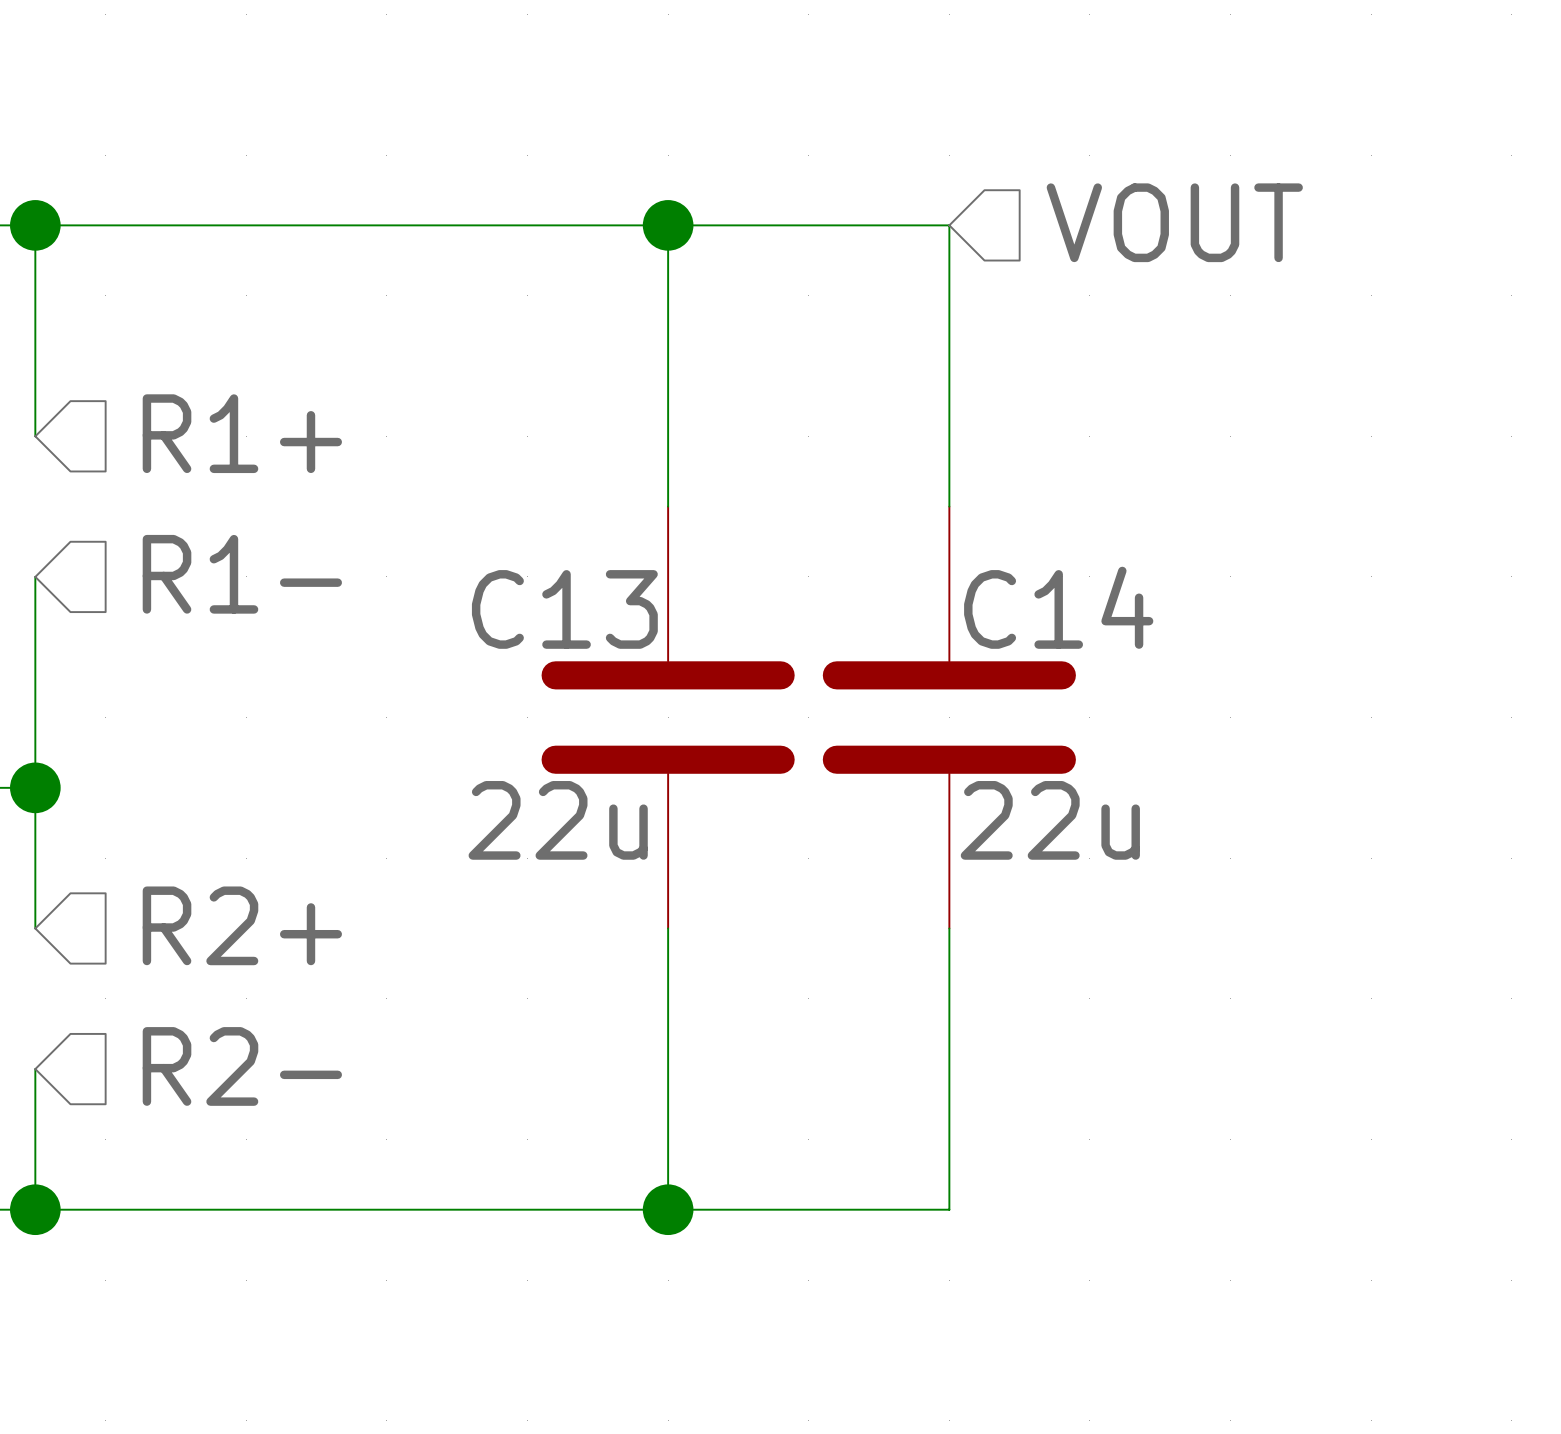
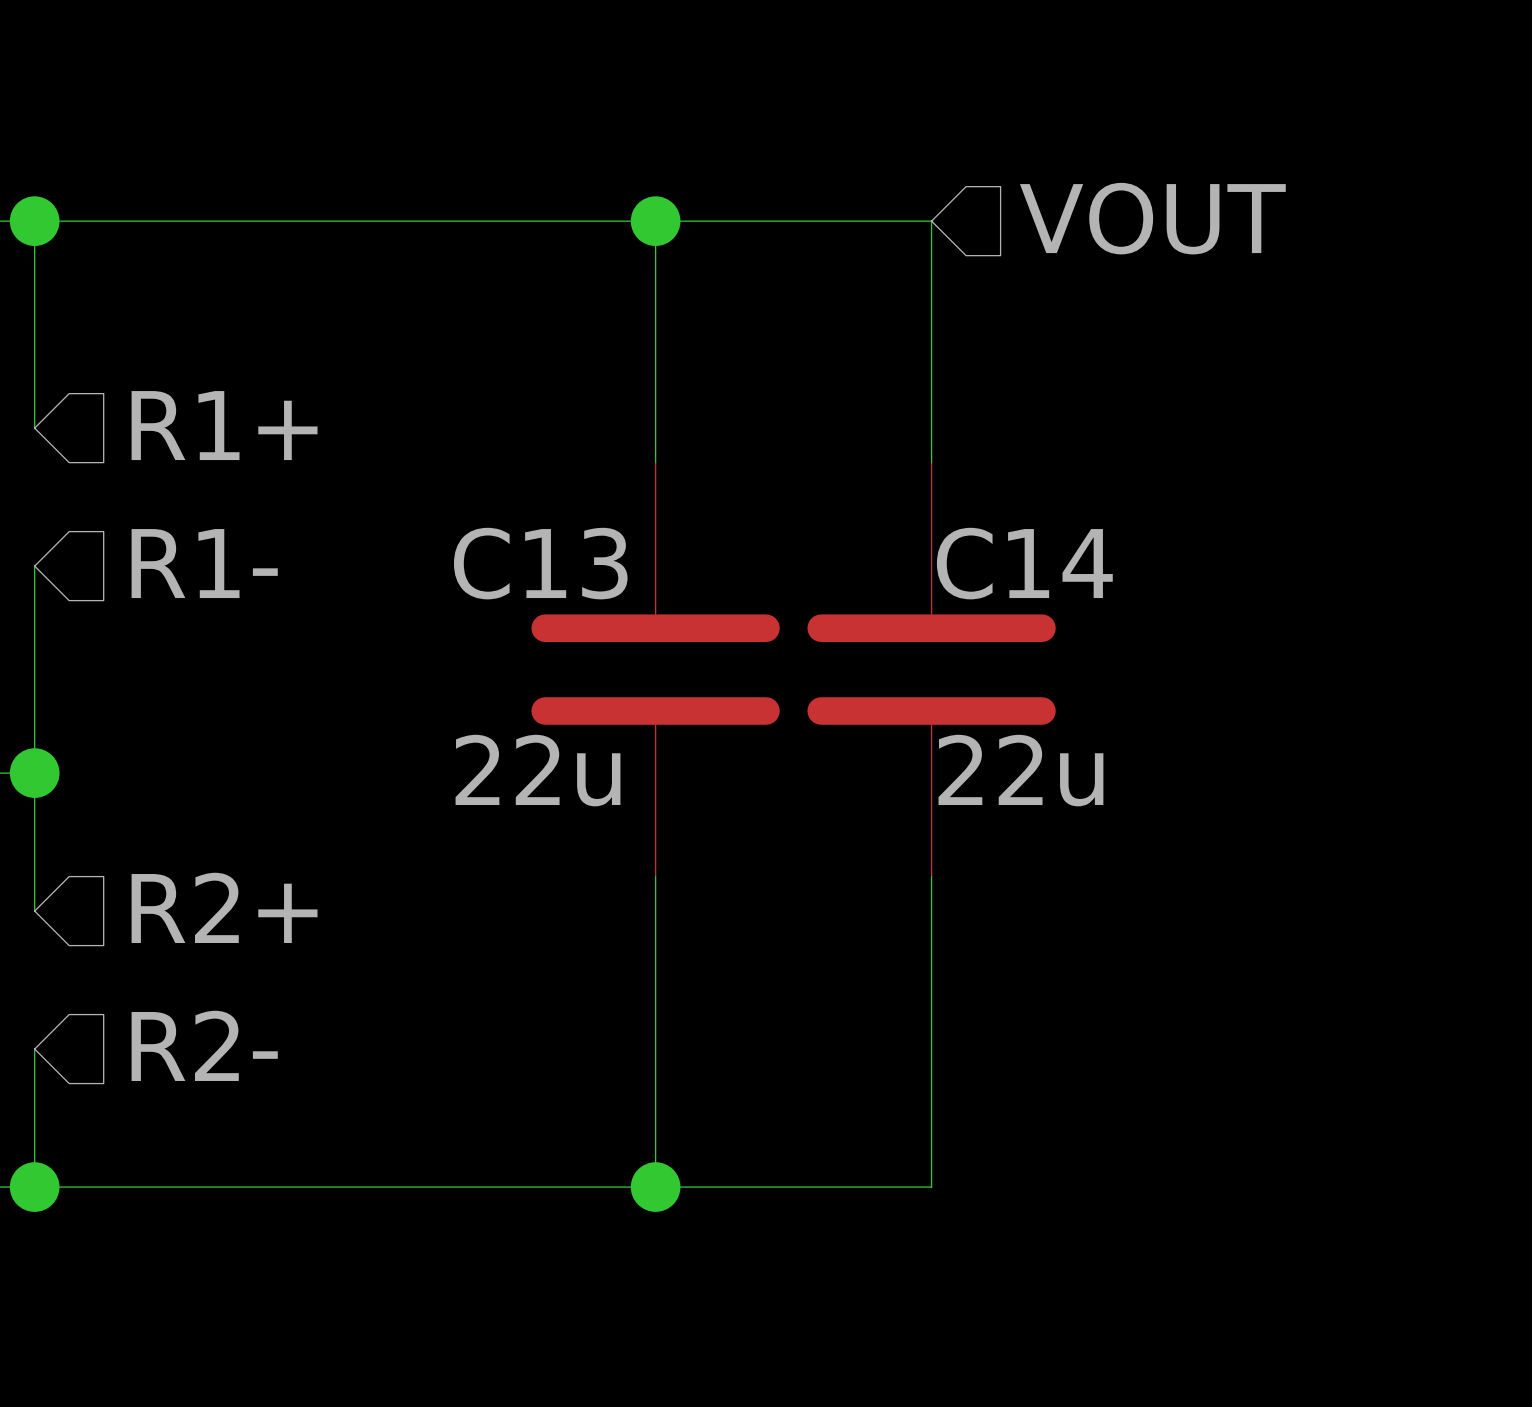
C13 position: (668, 717) -> (655, 669)
C14 position: (949, 717) -> (931, 669)

